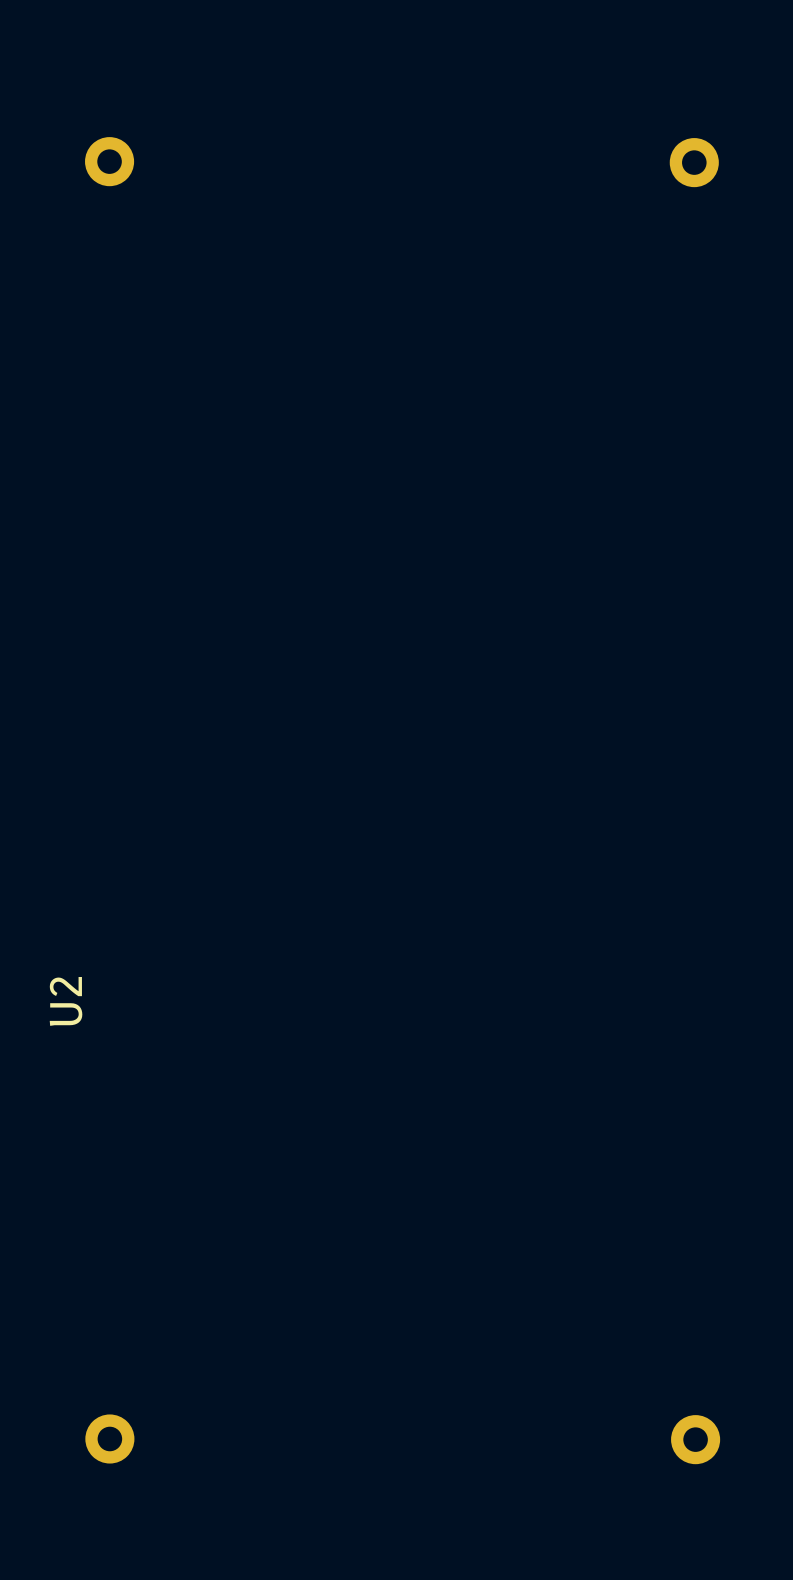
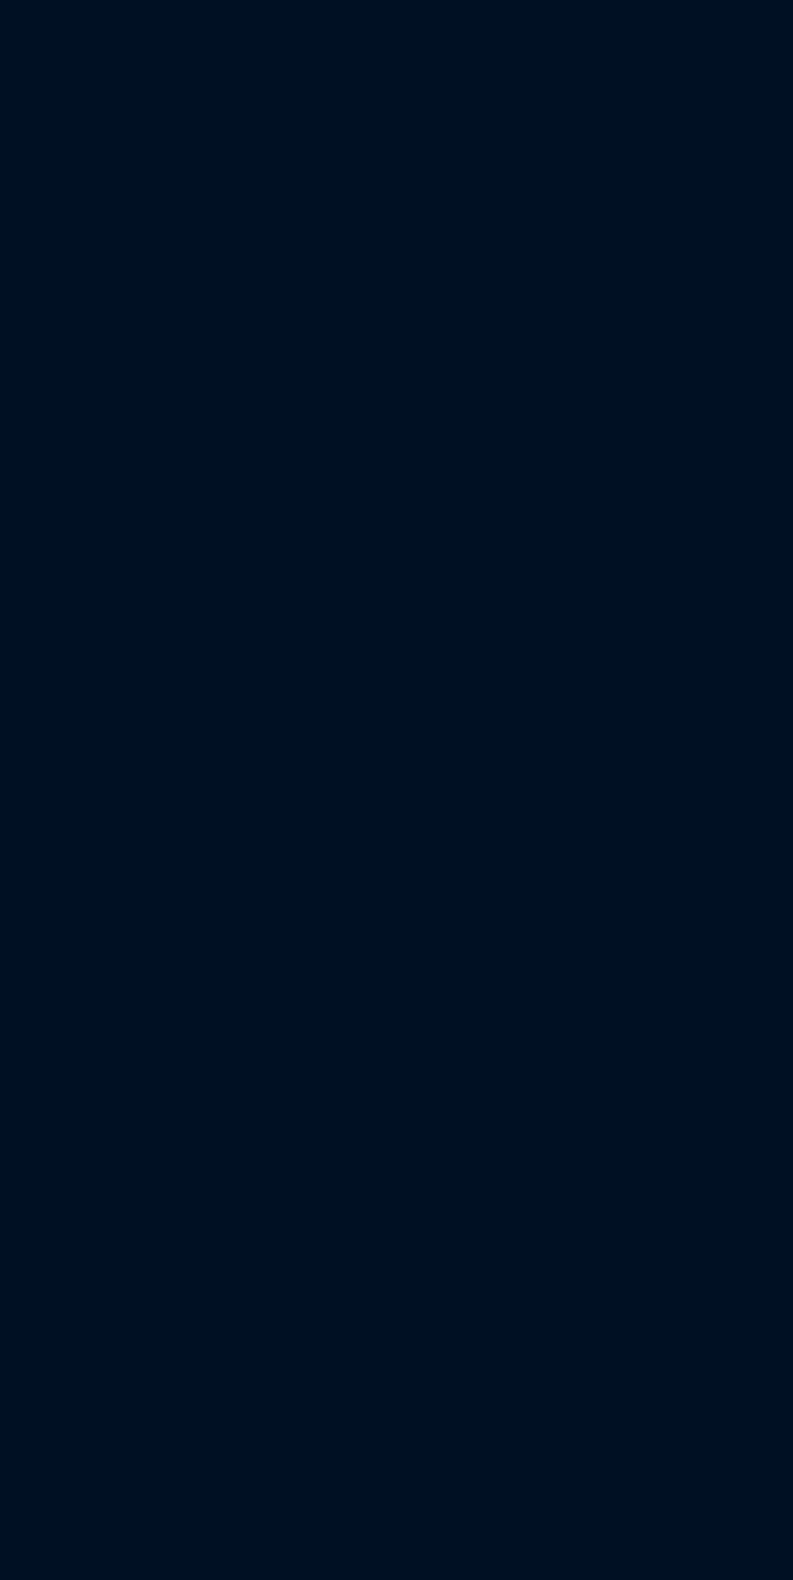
U2: (402, 800) -> none

